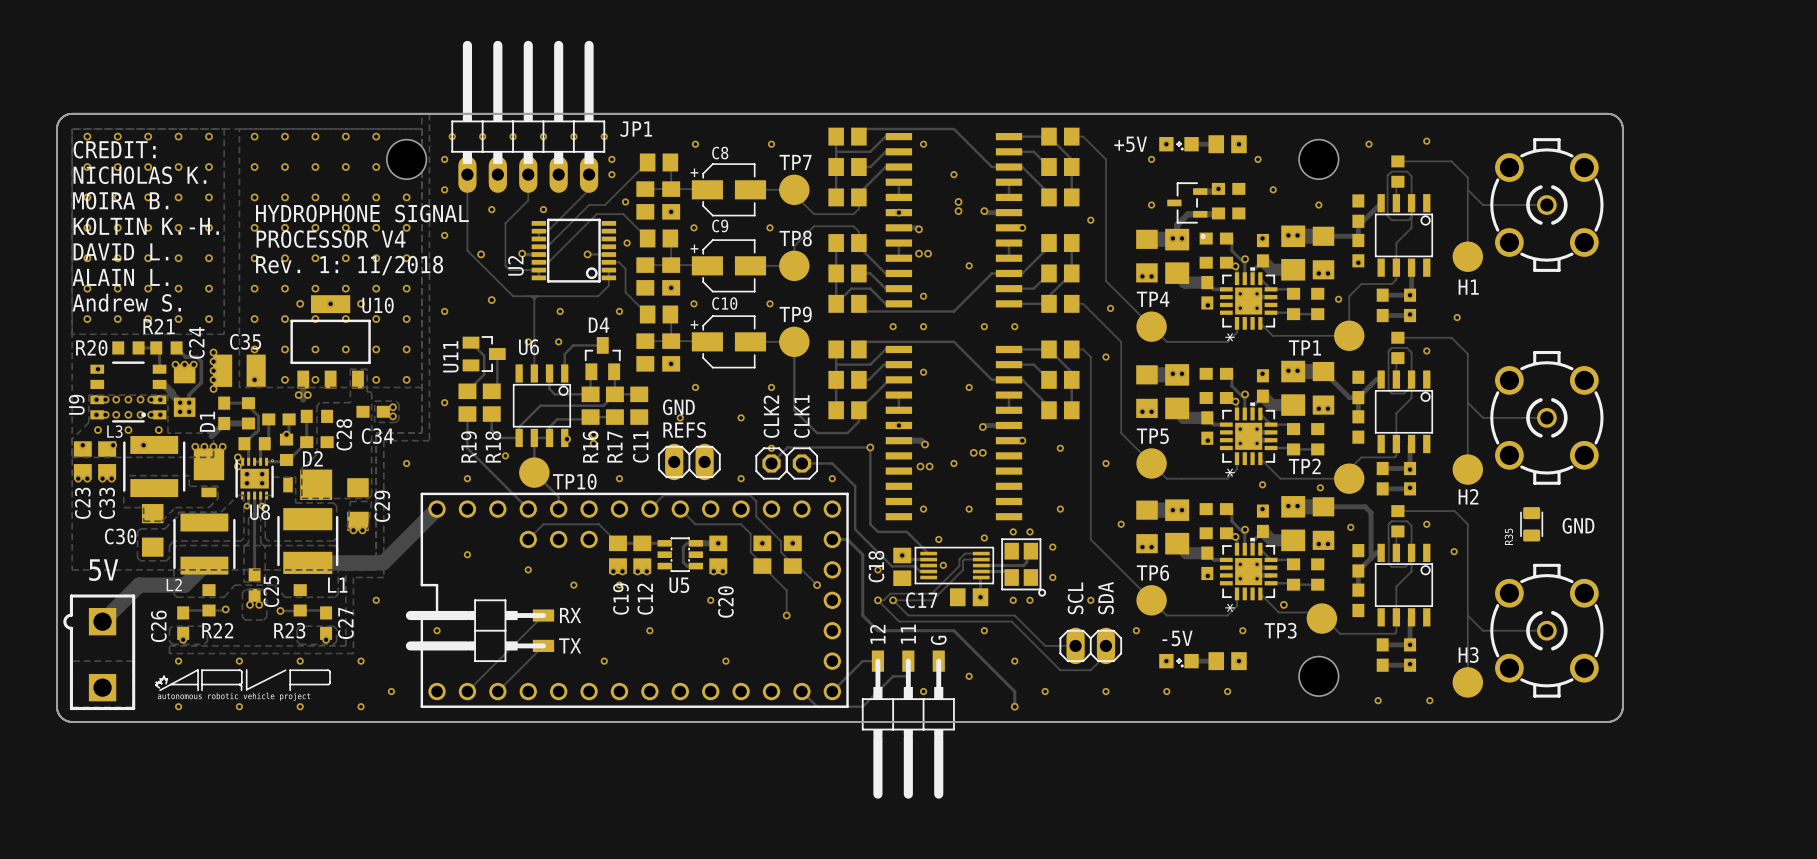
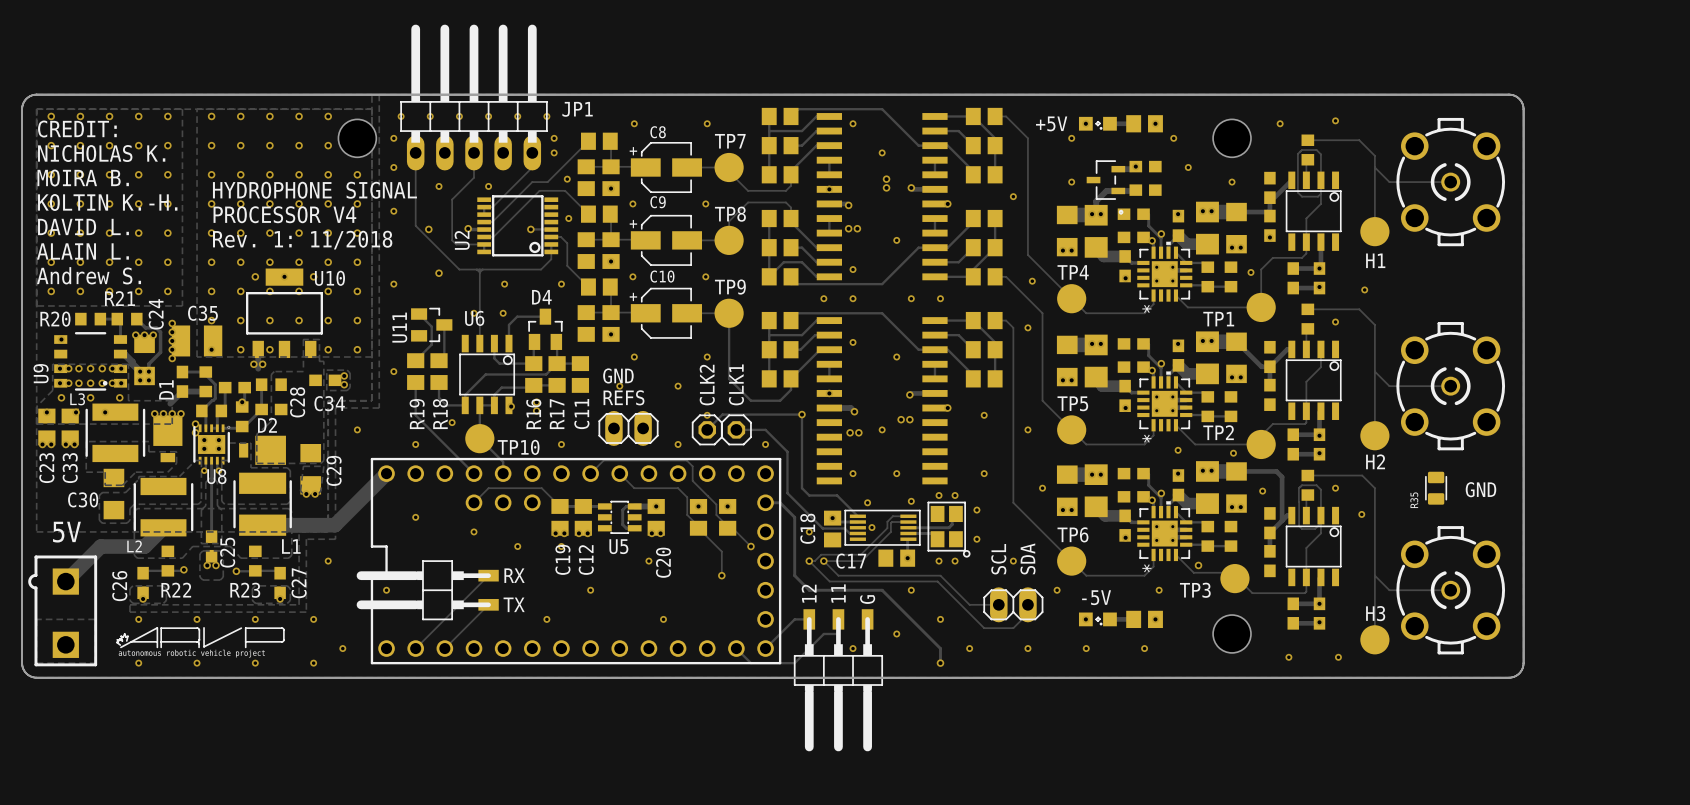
track: (1390, 349) (1388, 350) (1388, 390) (1391, 393) (1403, 393) (1411, 385) -> none
track: (1390, 349) (1407, 347) (1411, 352) (1411, 379) -> none

